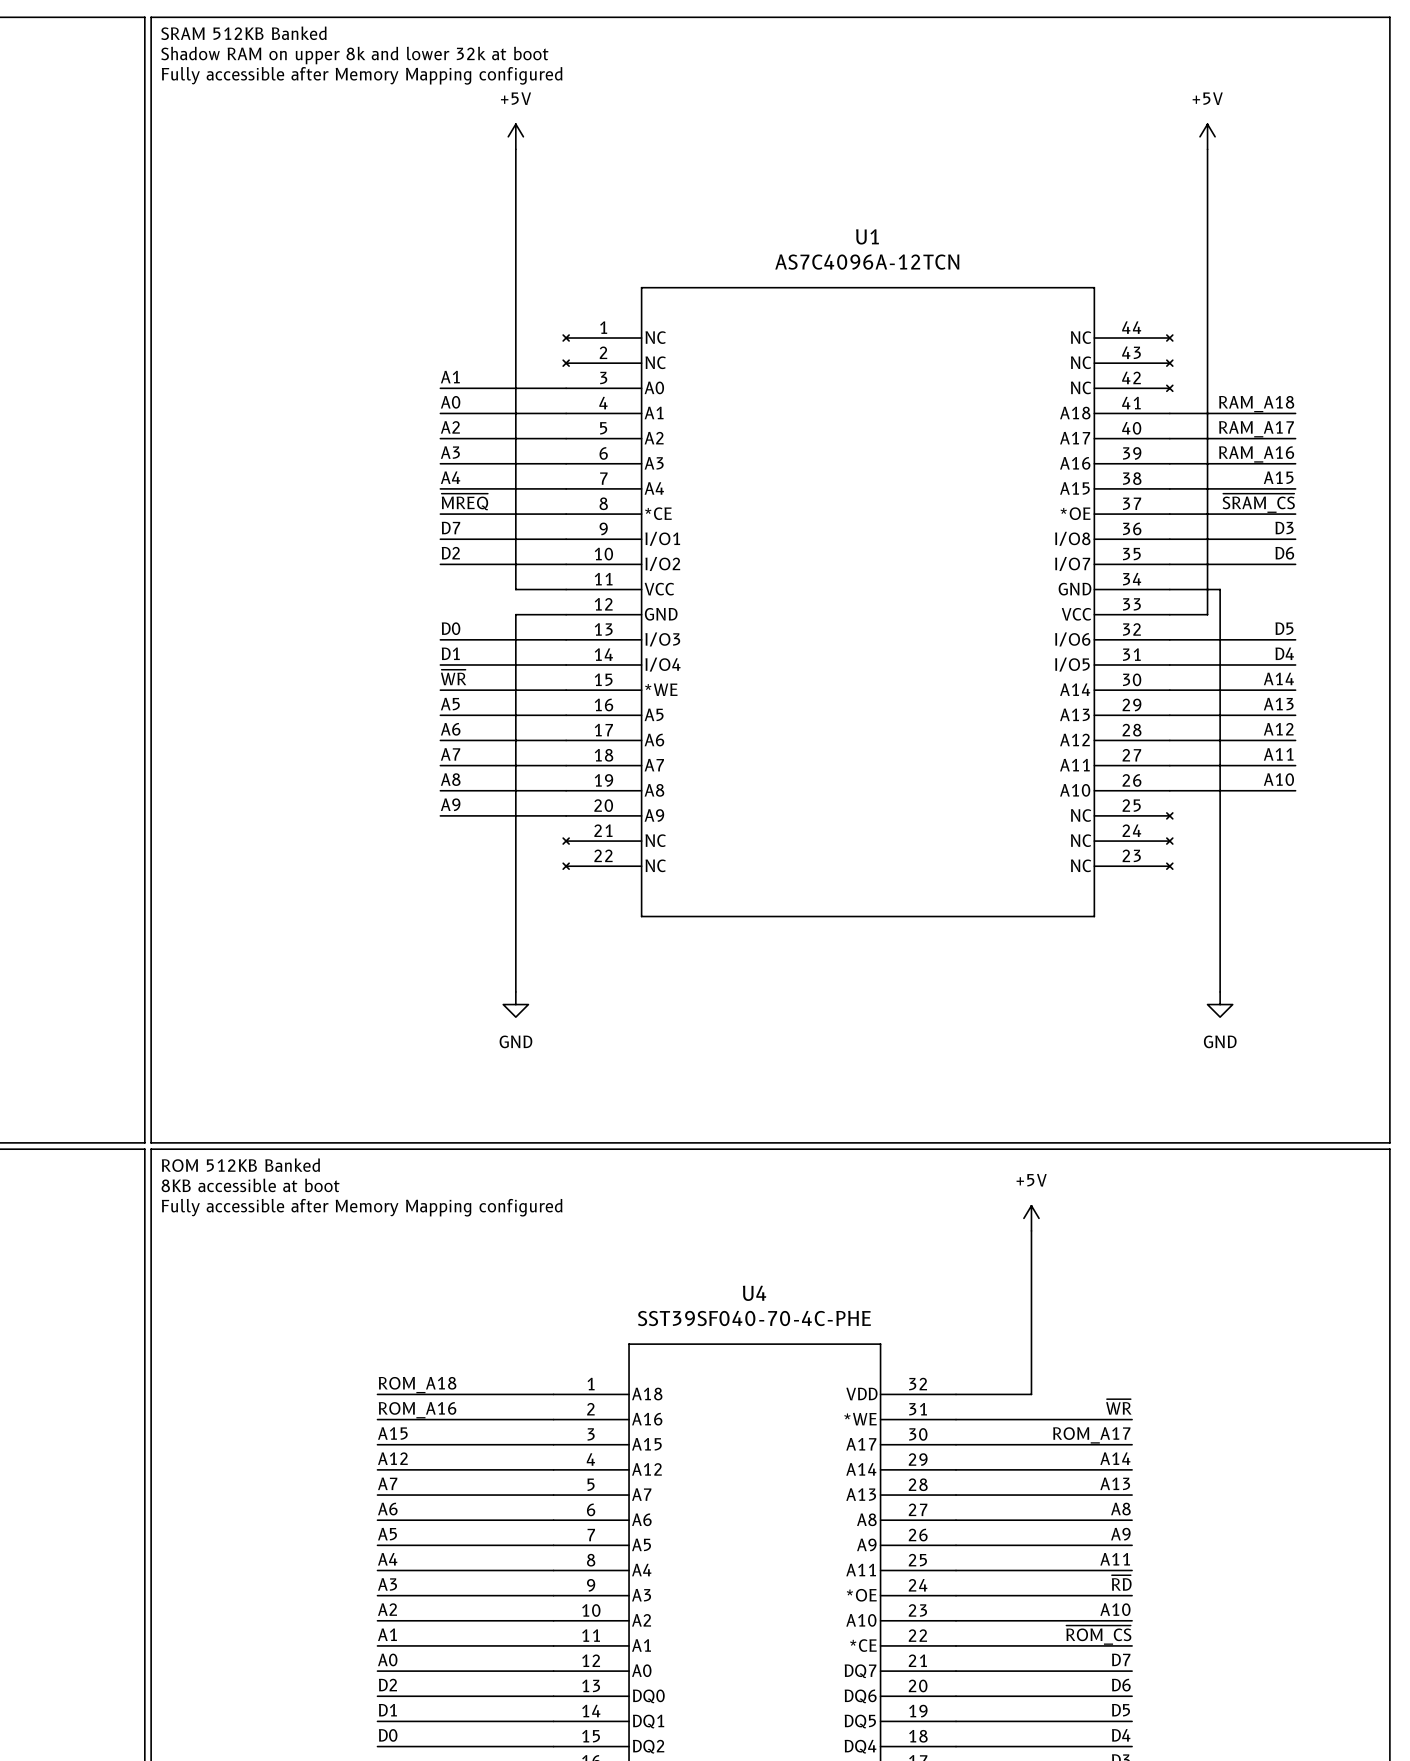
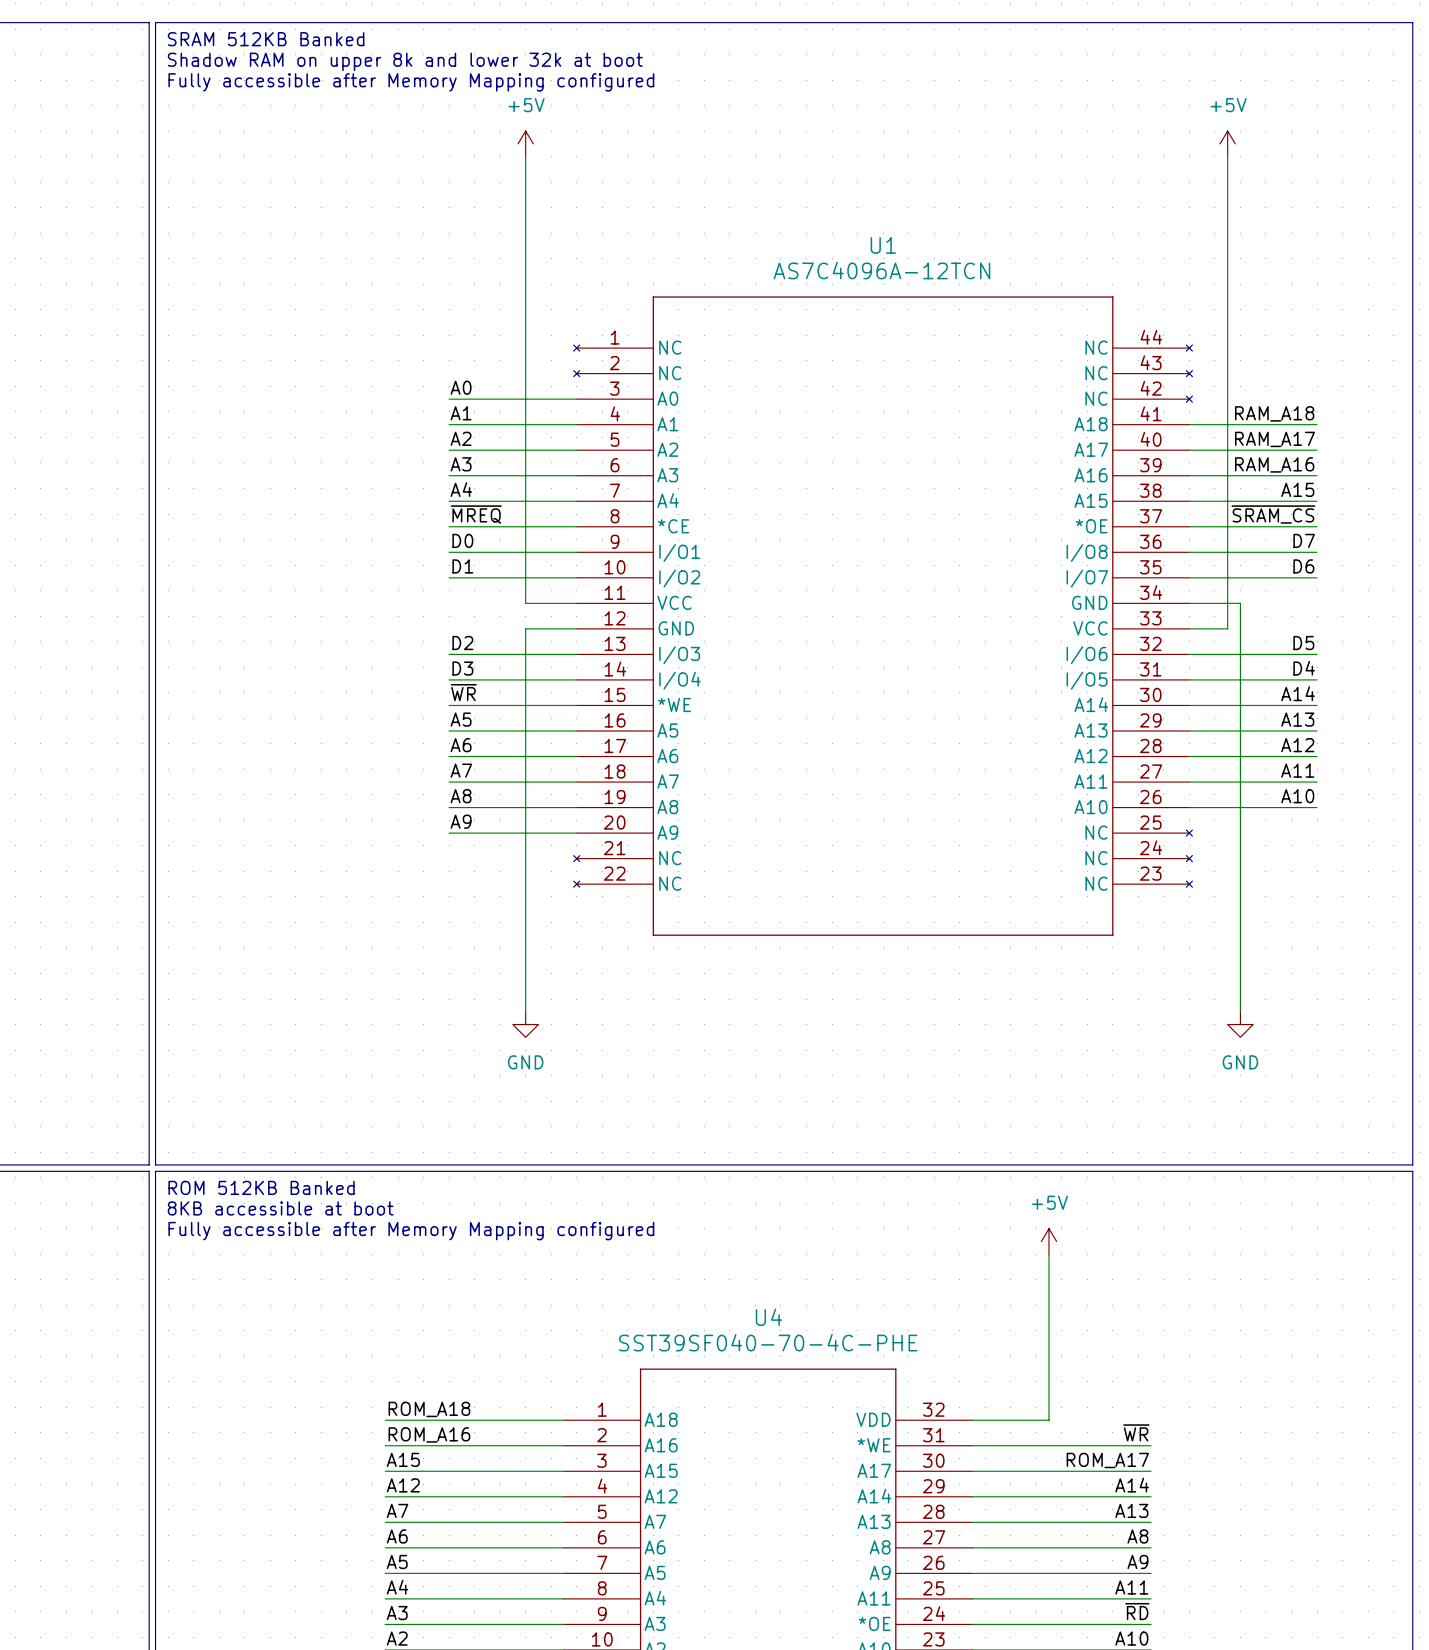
label: A1 (450, 377) -> A0 (461, 387)
label: A0 (450, 402) -> A1 (461, 413)
label: D7 (451, 528) -> D0 (462, 540)
label: D3 (1284, 528) -> D7 (1304, 540)
label: D2 (450, 553) -> D1 (462, 566)
label: D0 (451, 628) -> D2 (462, 643)
label: D1 (450, 653) -> D3 (462, 668)

